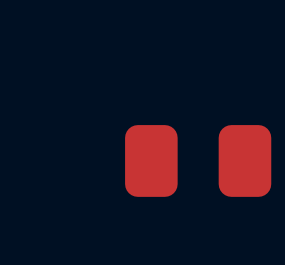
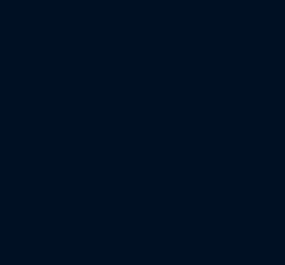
part: (198, 160) -> none

